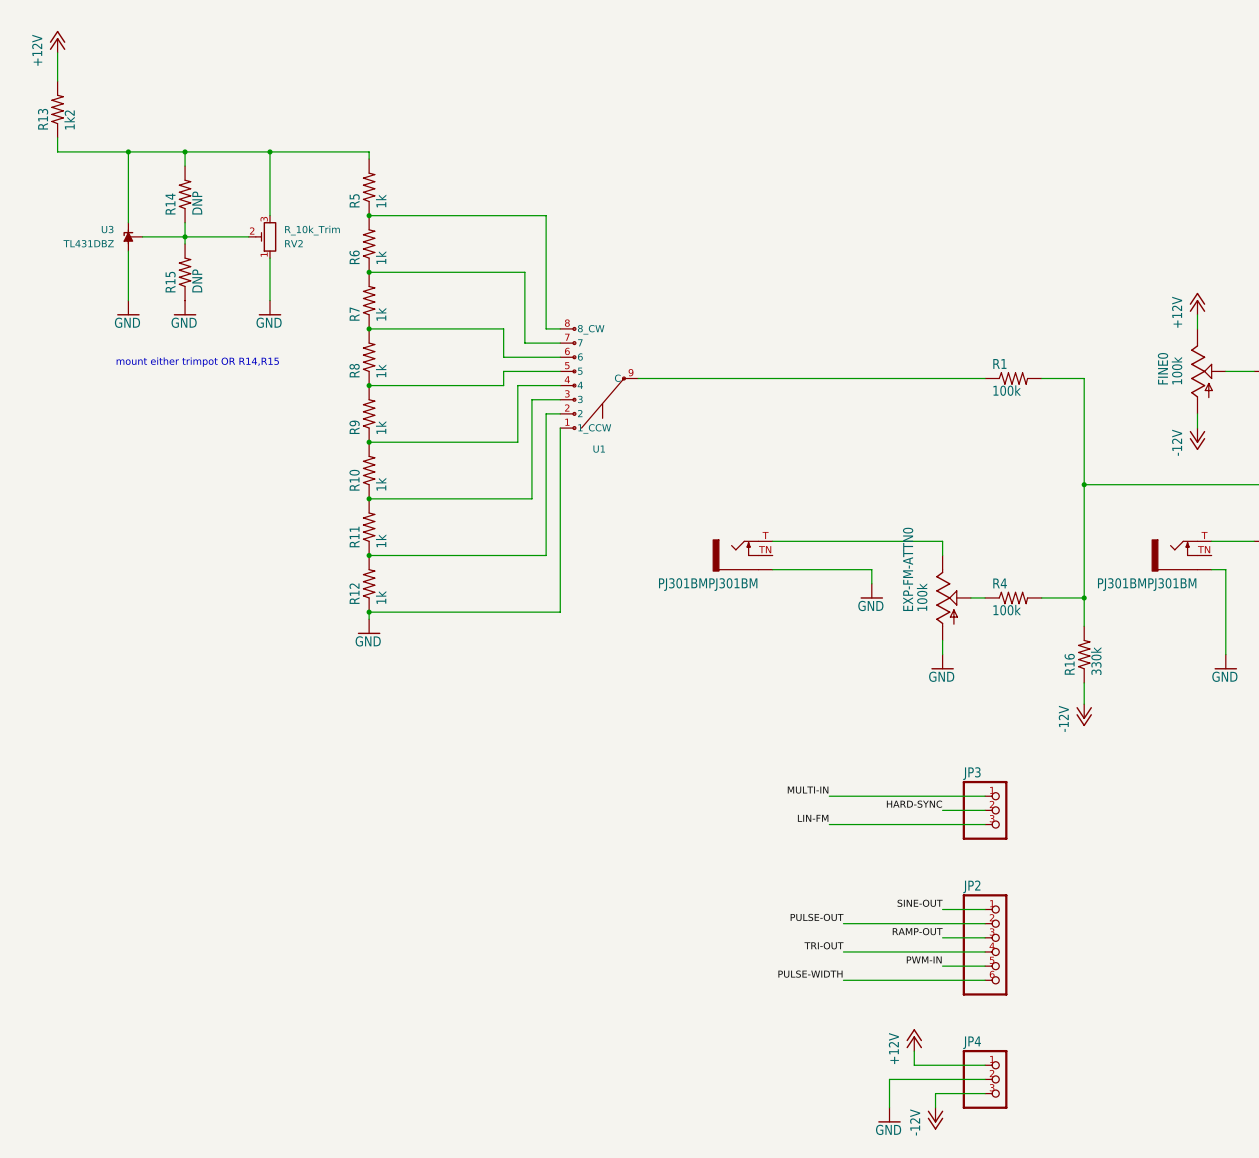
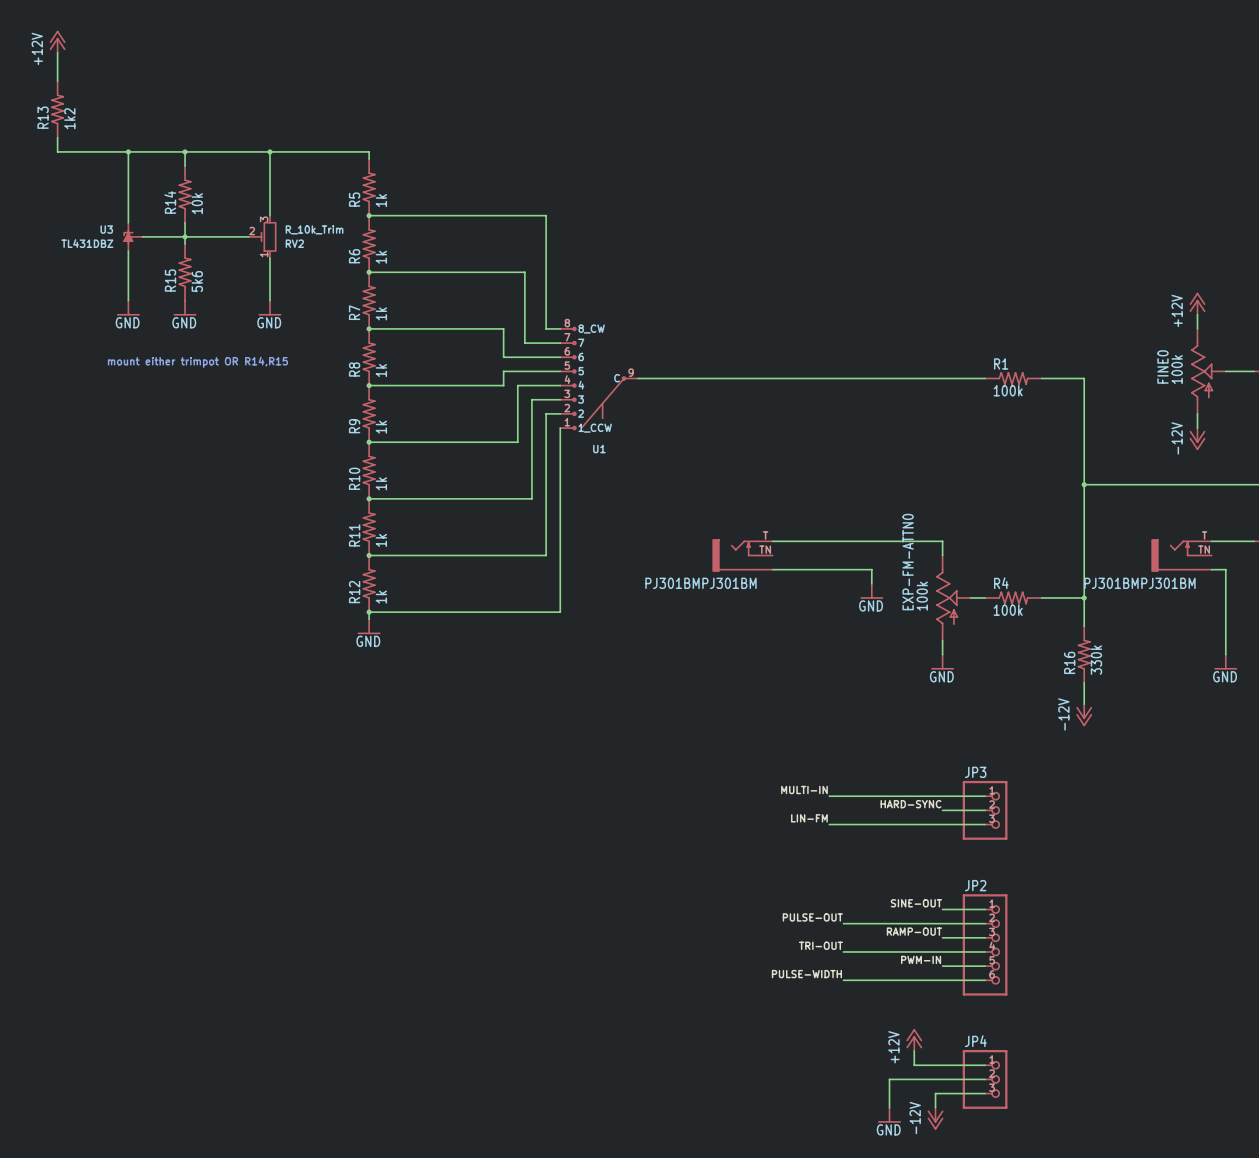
R14 value: DNP (197, 203) -> 10k (197, 203)
R15 value: DNP (197, 280) -> 5k6 (197, 281)

